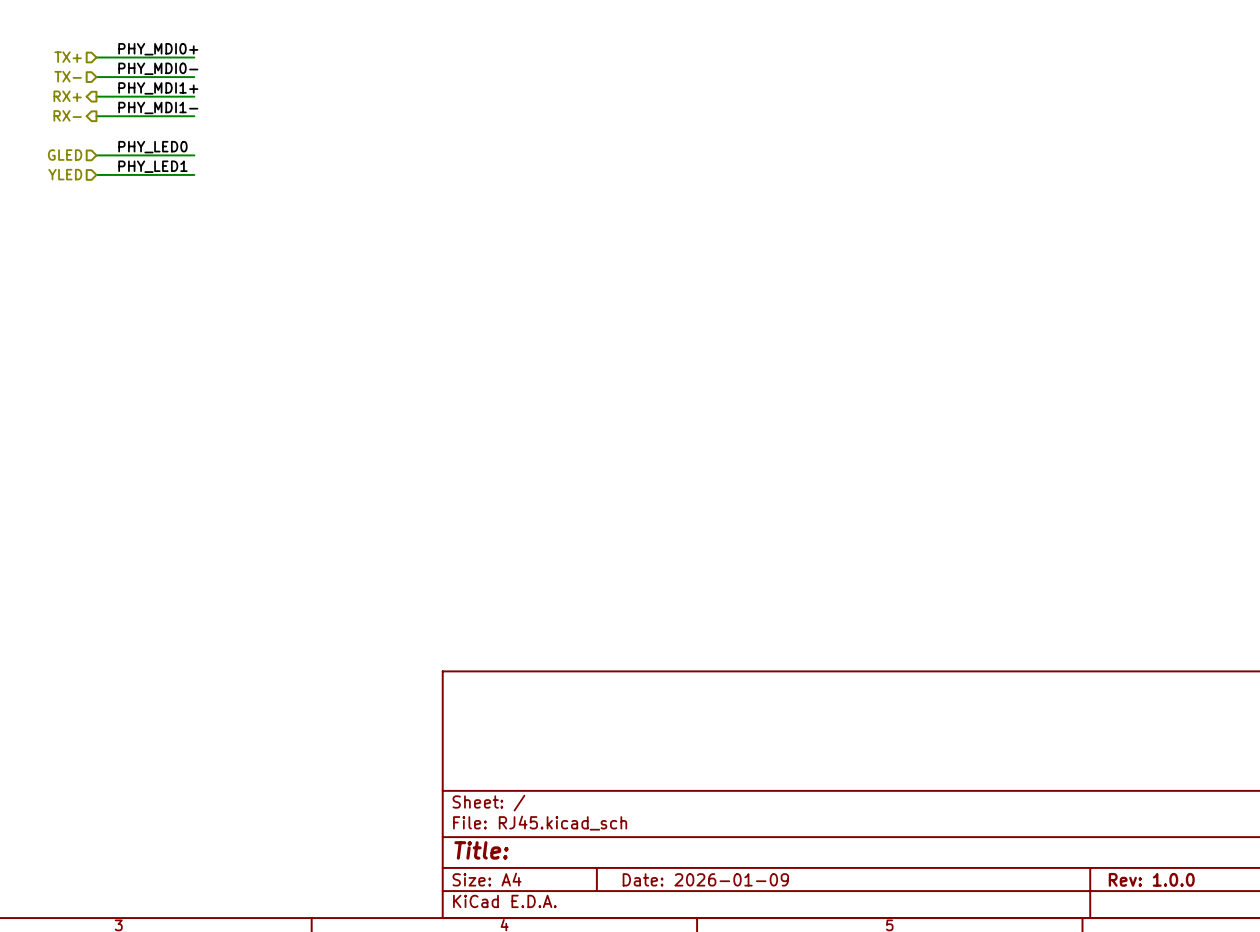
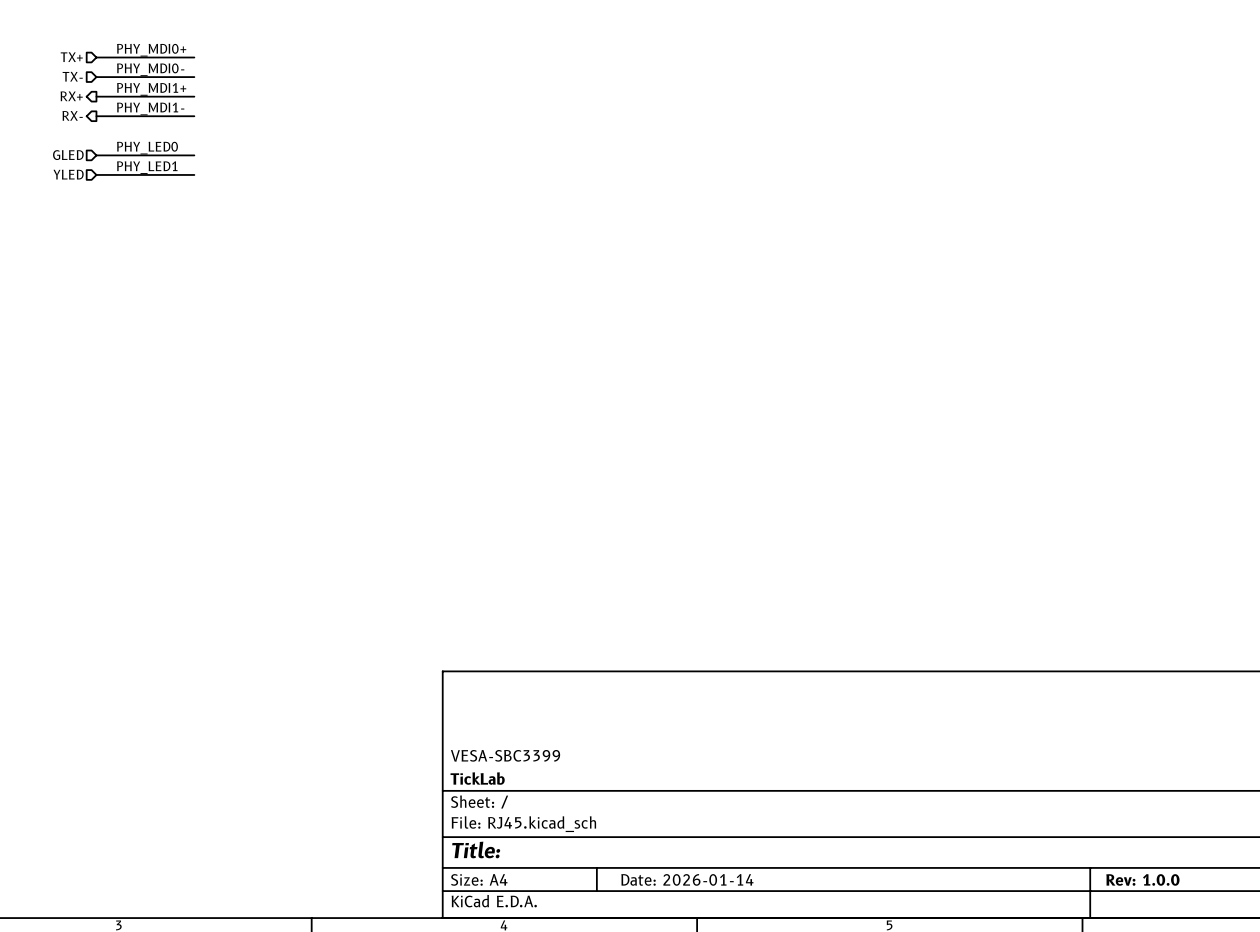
title block: none -> VESA-SBC3399 (505, 755)
title block: none -> TickLab (477, 778)
title block: Date: 2026-01-09 (705, 879) -> Date: 2026-01-14 (687, 879)

